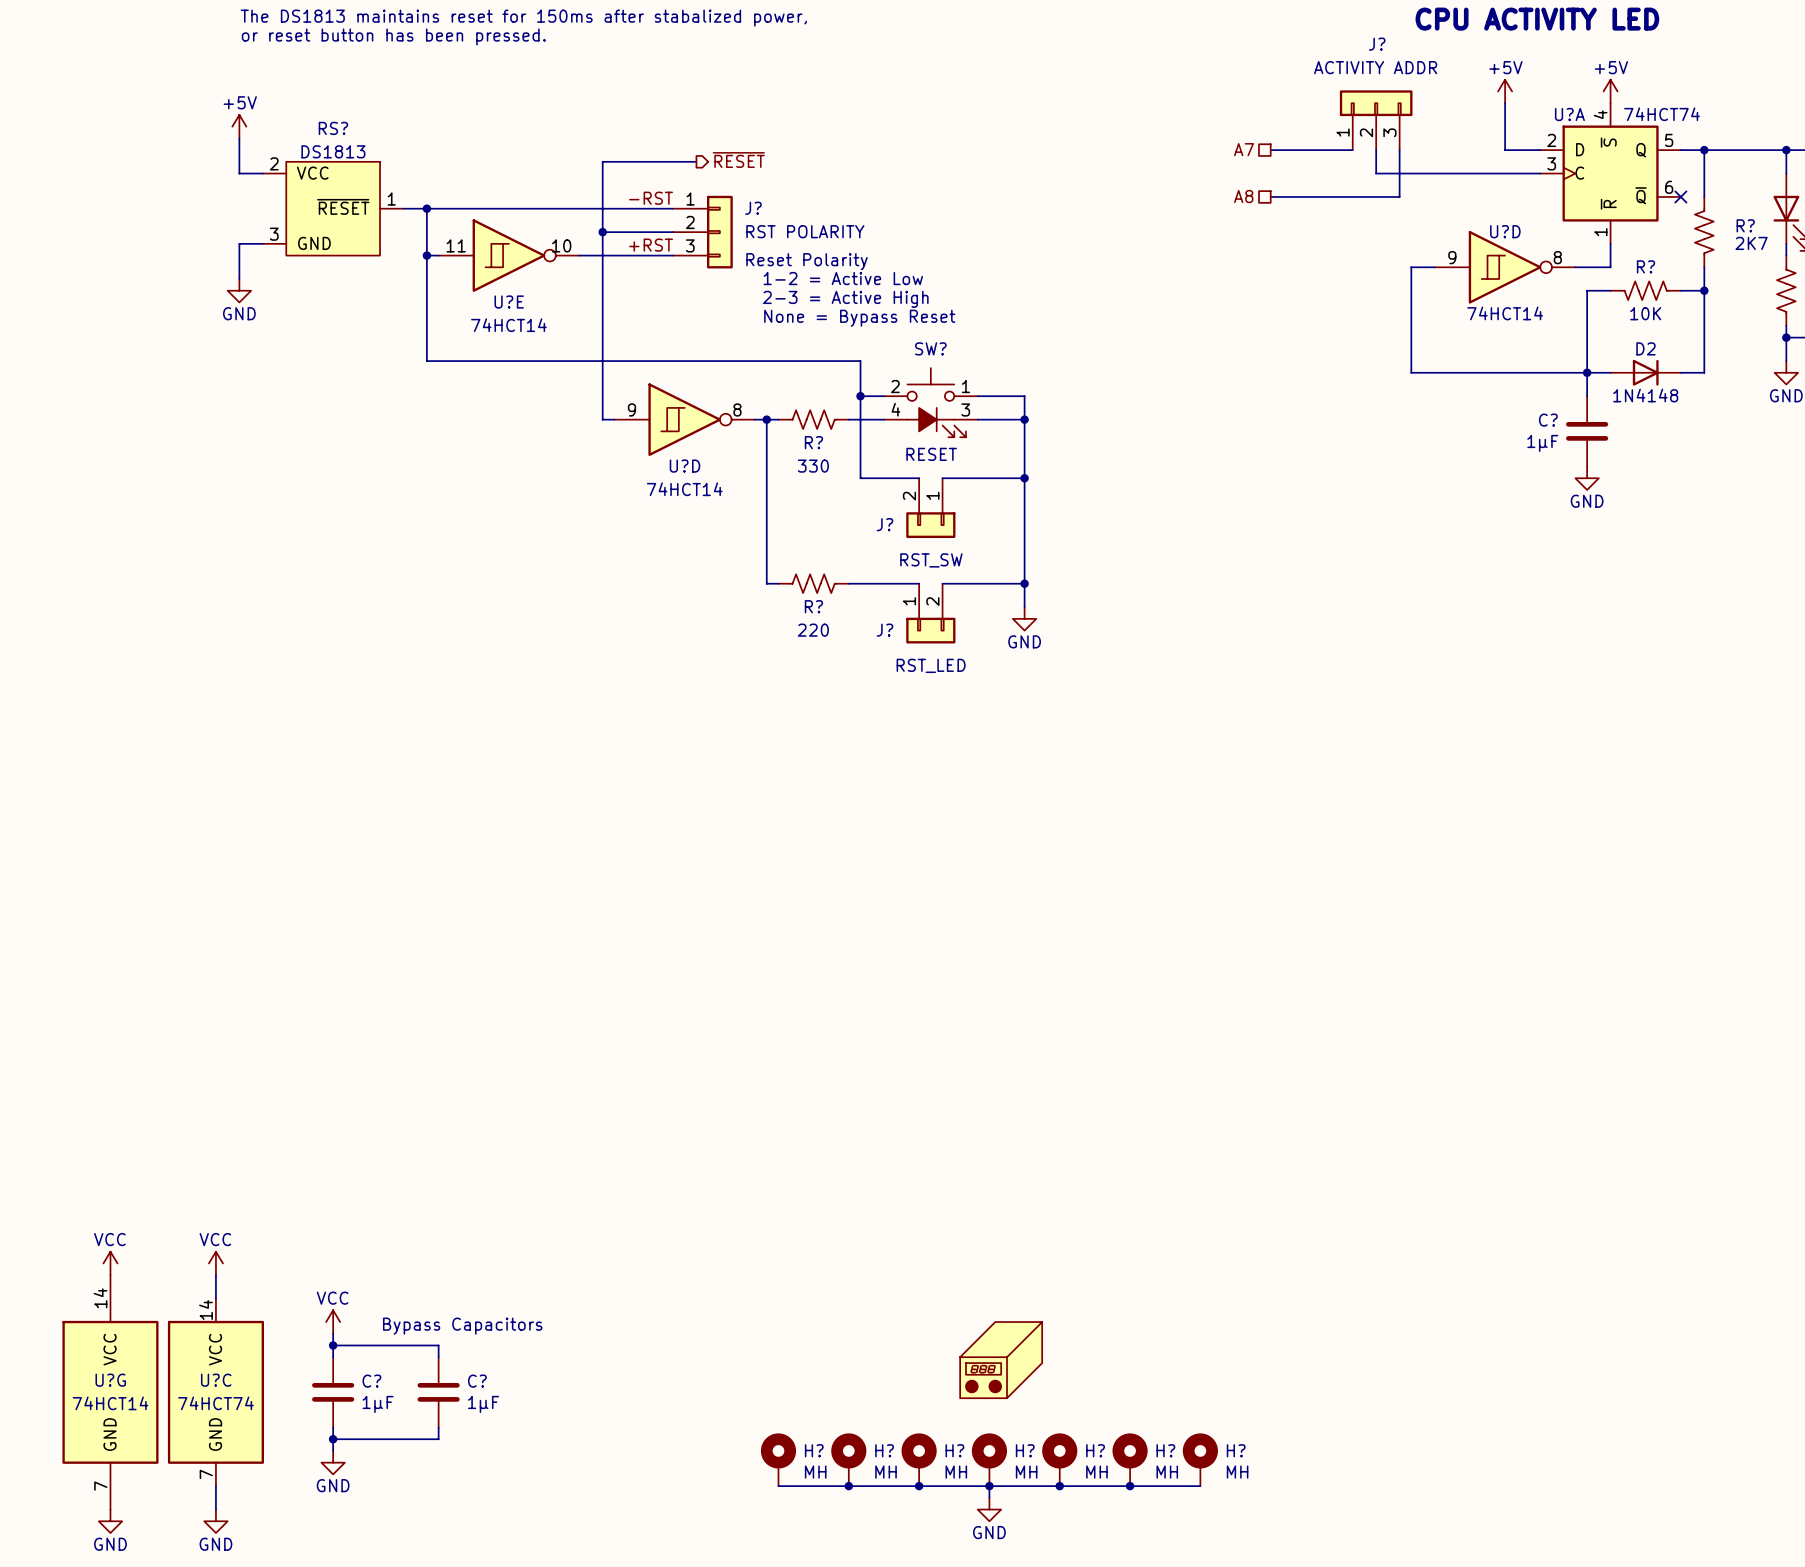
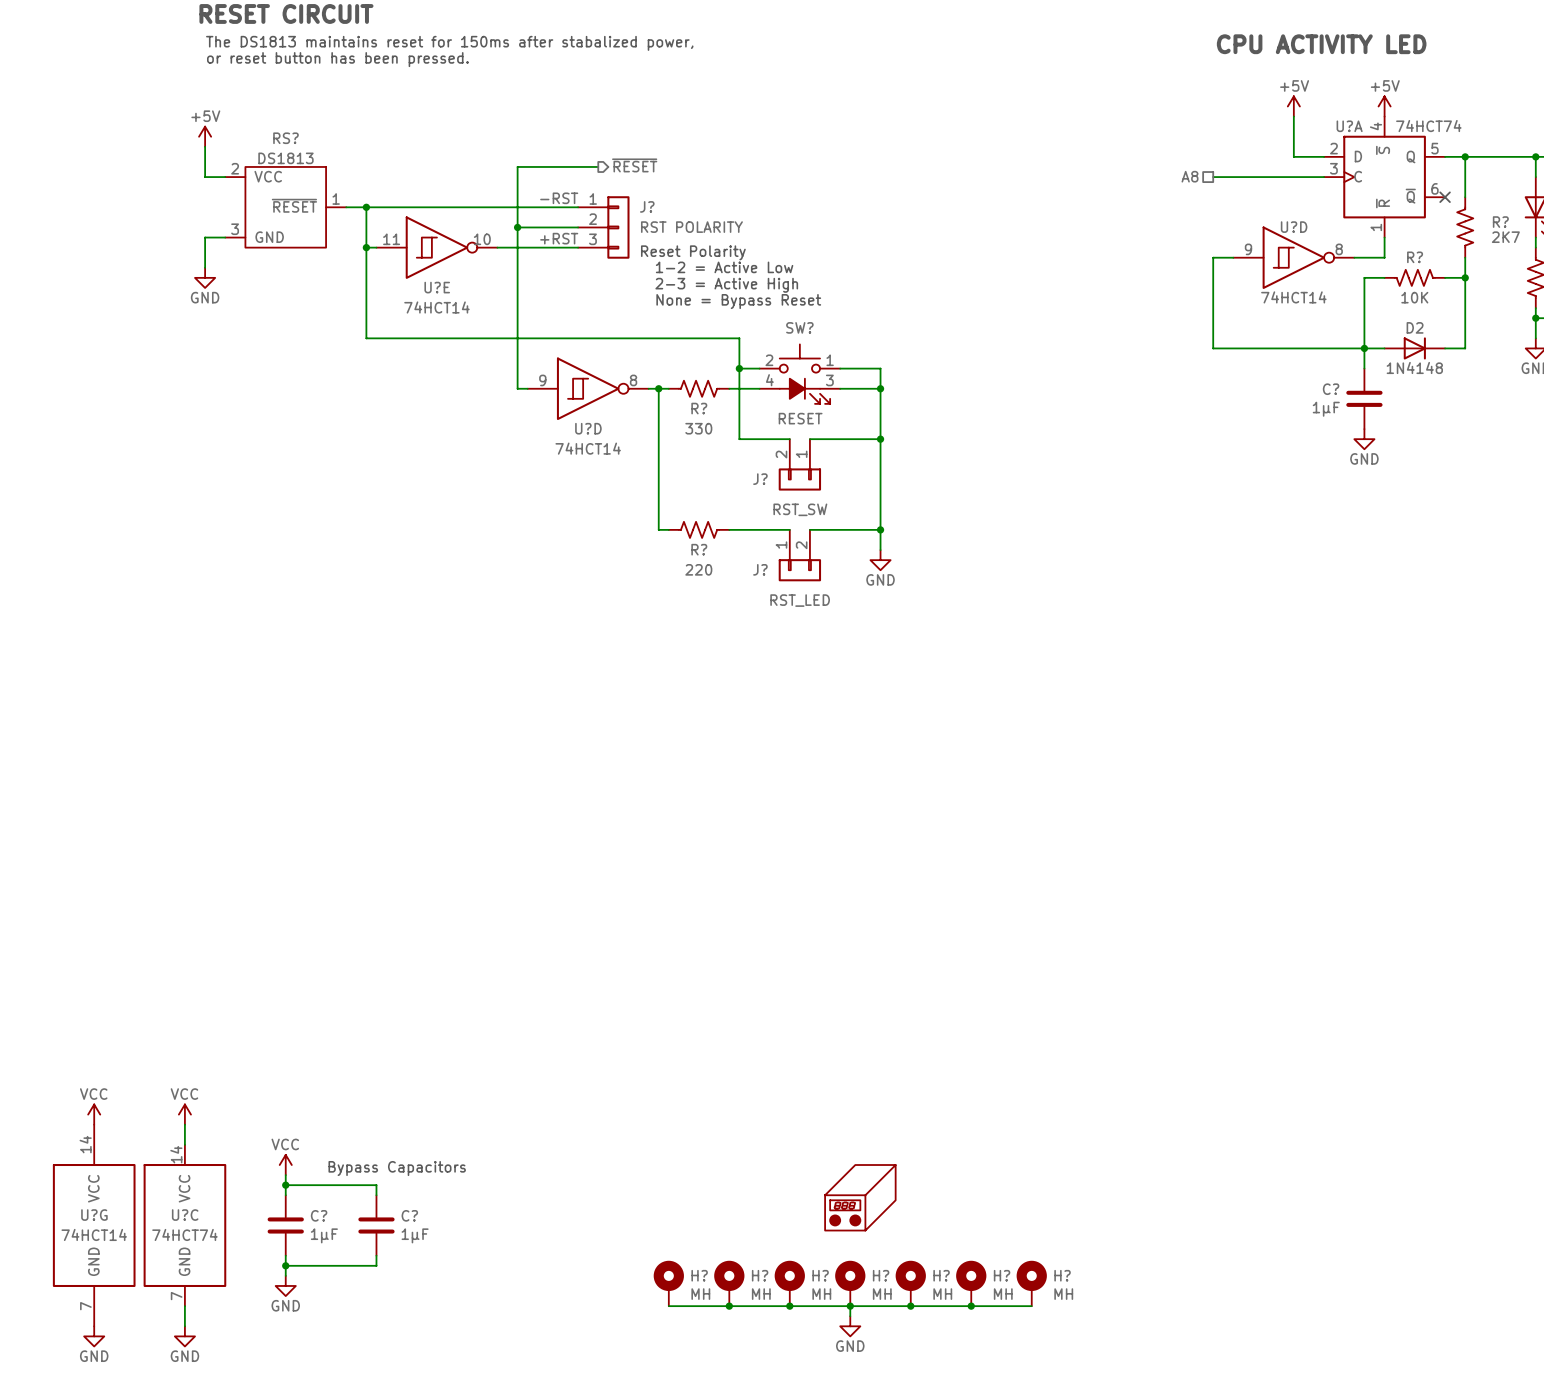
J?: ACTIVITY ADDR (1376, 120) -> none
hierarchical label: A7 (1244, 149) -> none
wire: (1270, 150) (1352, 150) -> none
wire: (1376, 150) (1376, 173) (1411, 173) -> none
wire: (1399, 150) (1399, 196) (1270, 196) -> none
hierarchical label position: A8 (1243, 196) -> A8 (1190, 176)

